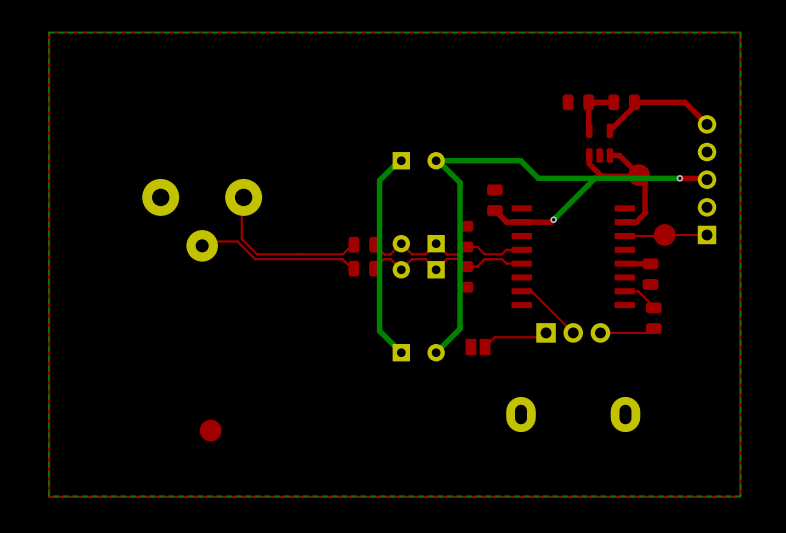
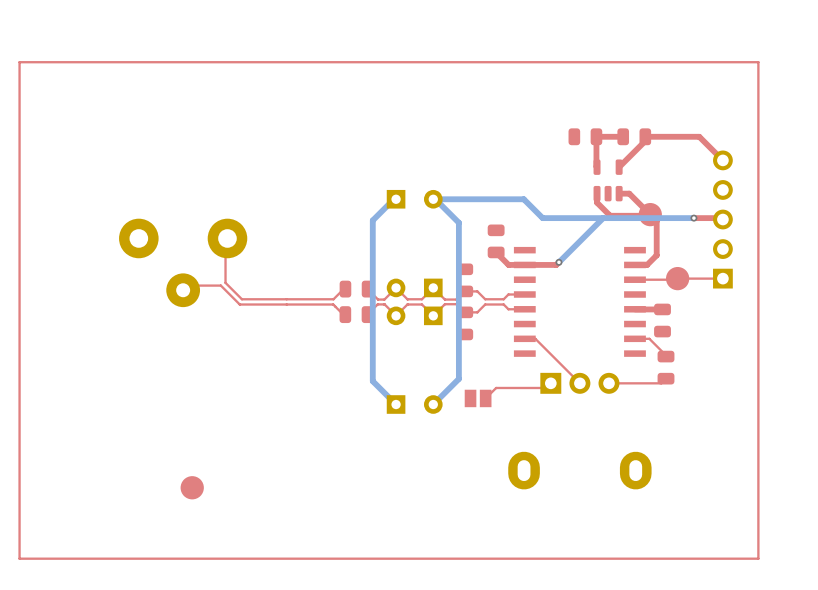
bottom zone outline: (740, 32) (48, 32) (48, 496) (740, 496) (740, 32) -> none

